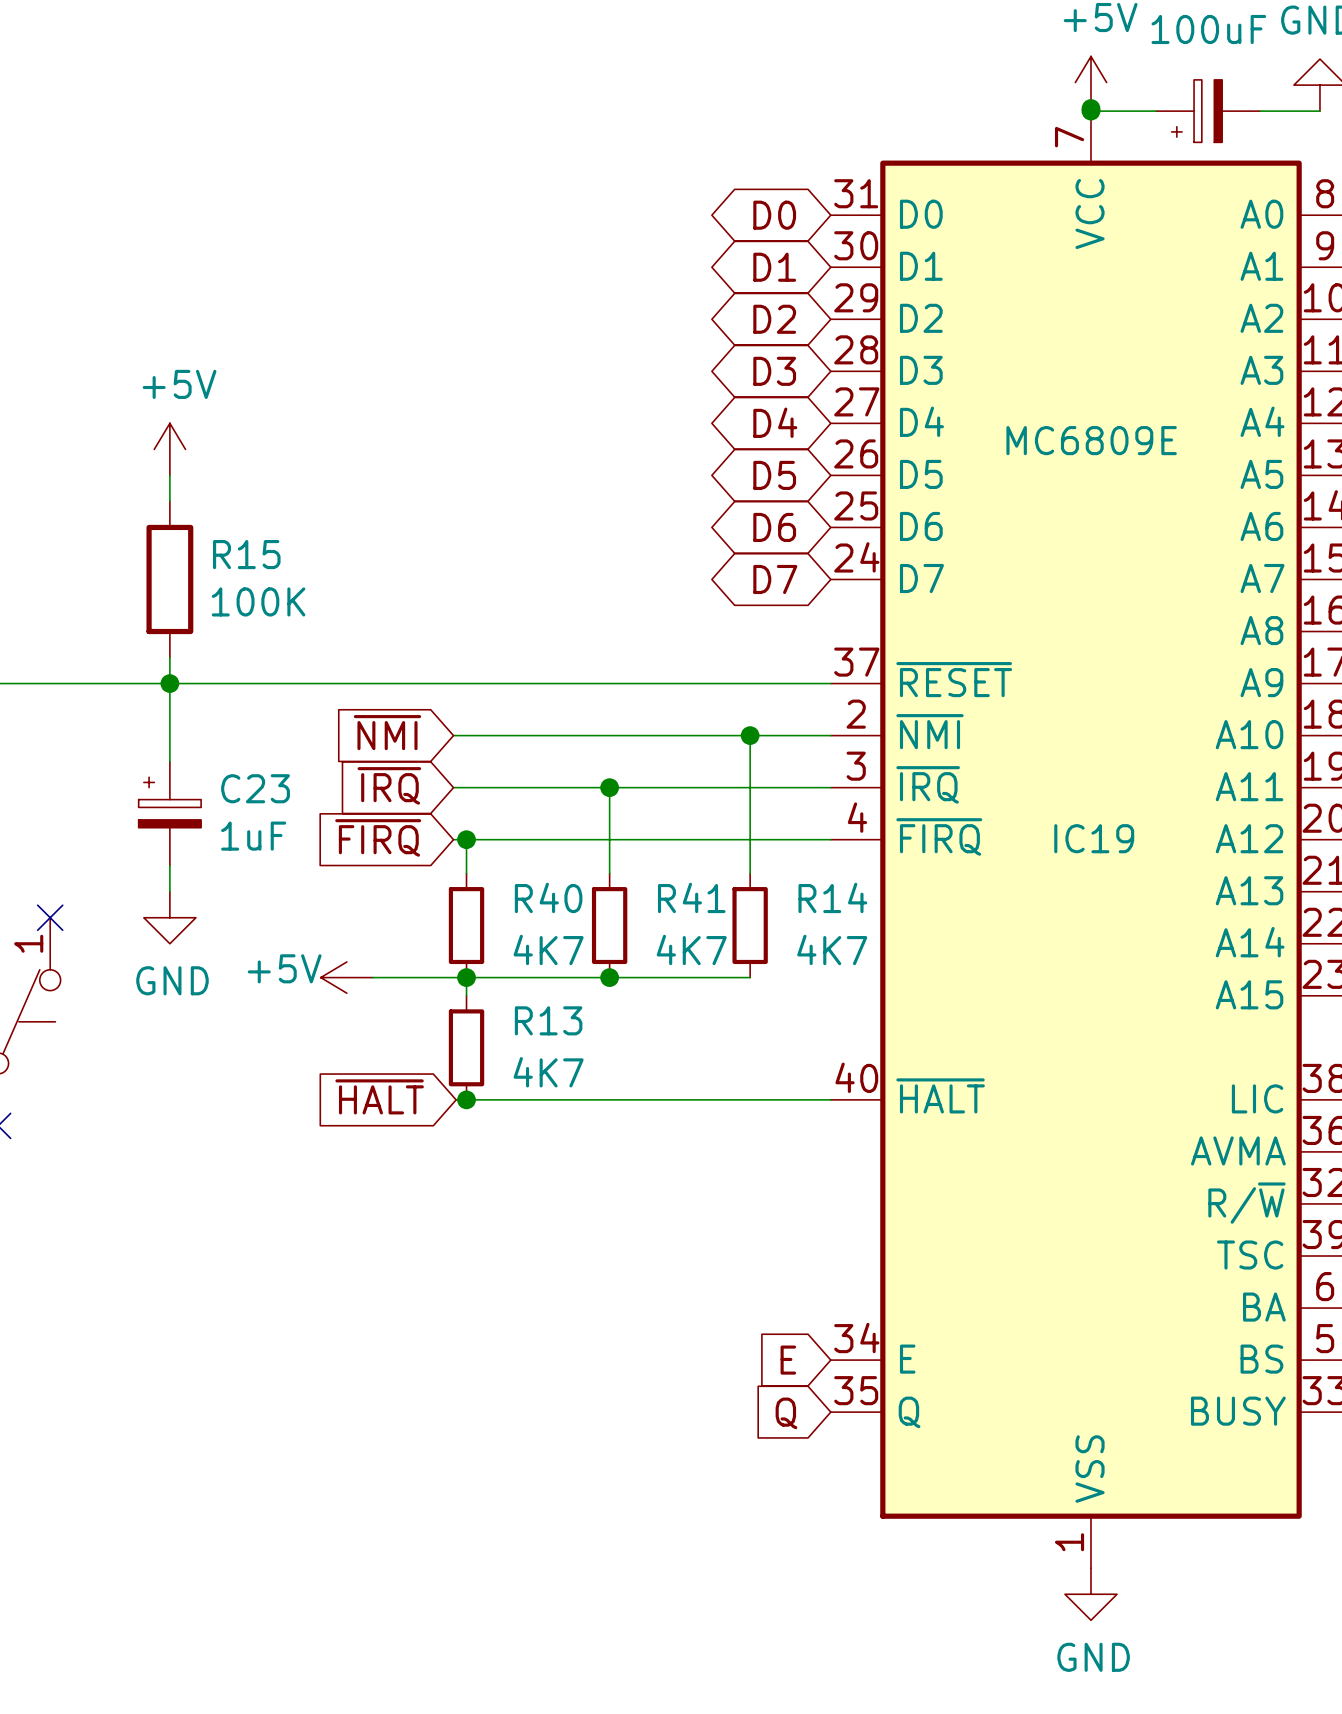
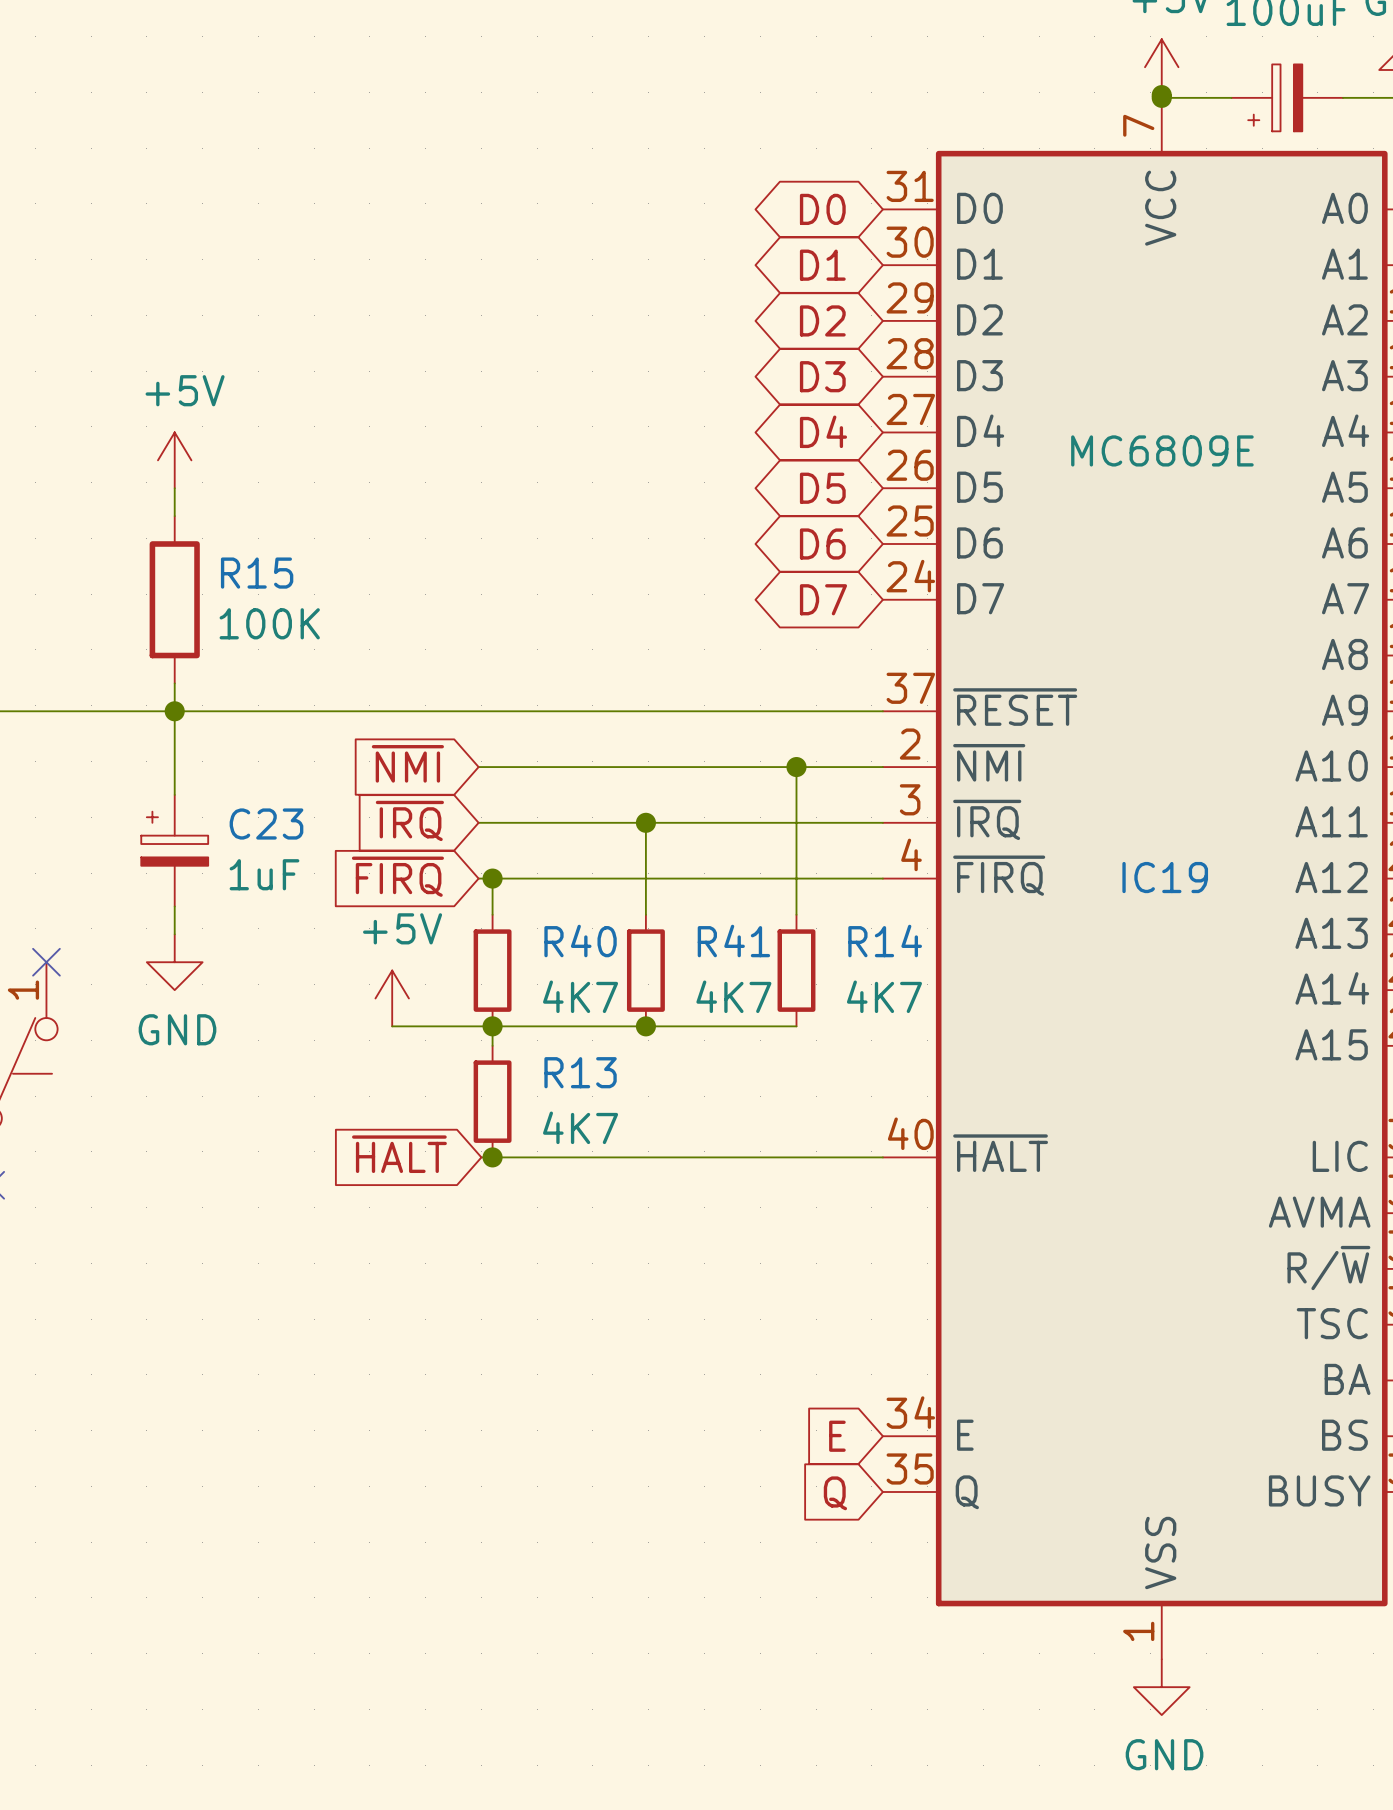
power symbol rotation: 0° (346, 977) -> 90° clockwise (392, 998)
power symbol position: +5V (346, 977) -> +5V (392, 998)

